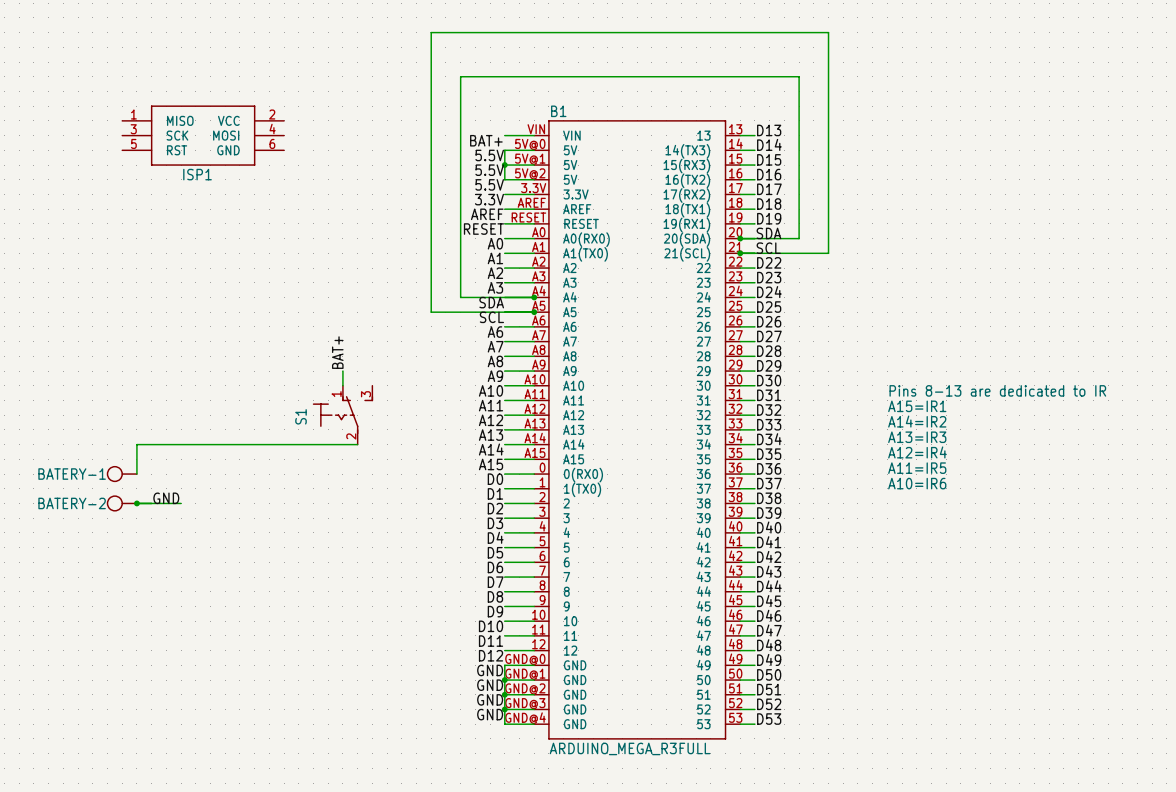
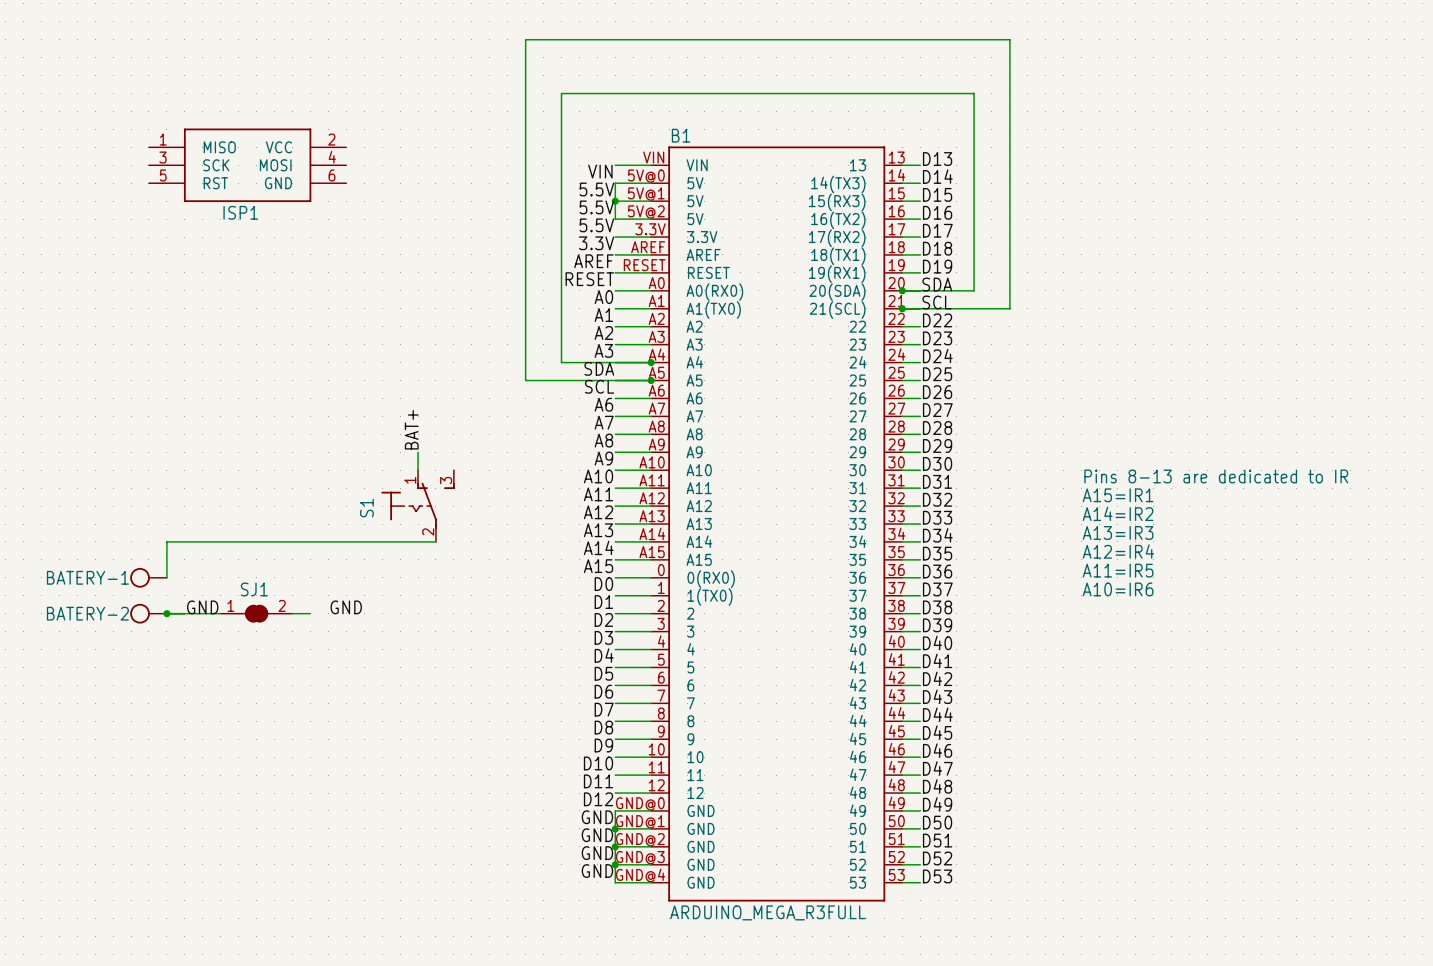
label: BAT+ (486, 140) -> VIN (600, 171)
label: none -> GND (346, 607)
SJ1: none -> (256, 613)
wire: none -> (292, 613) (310, 613)

